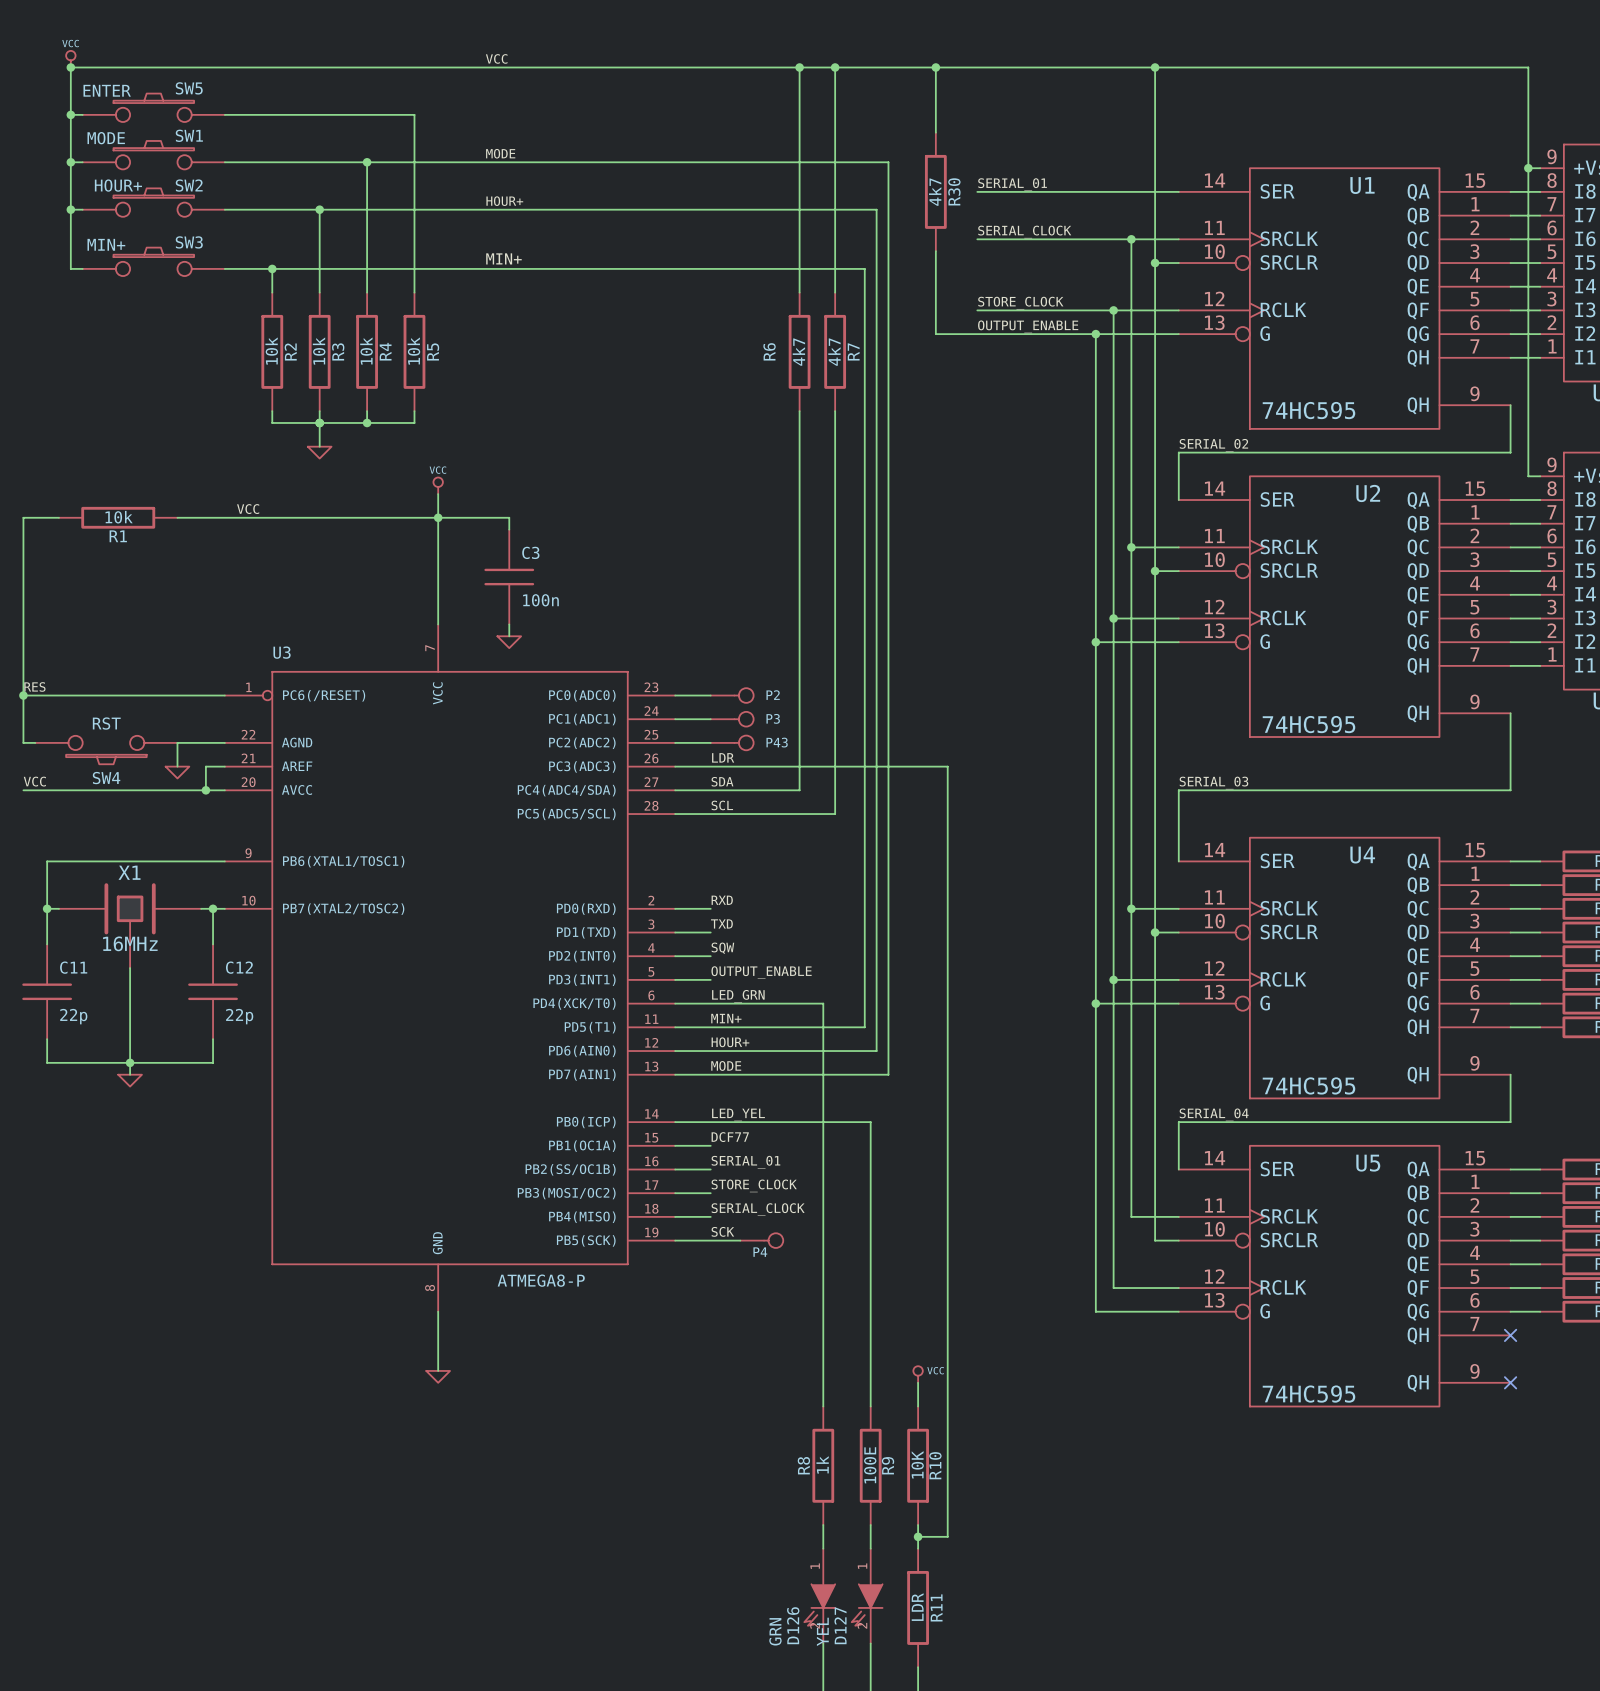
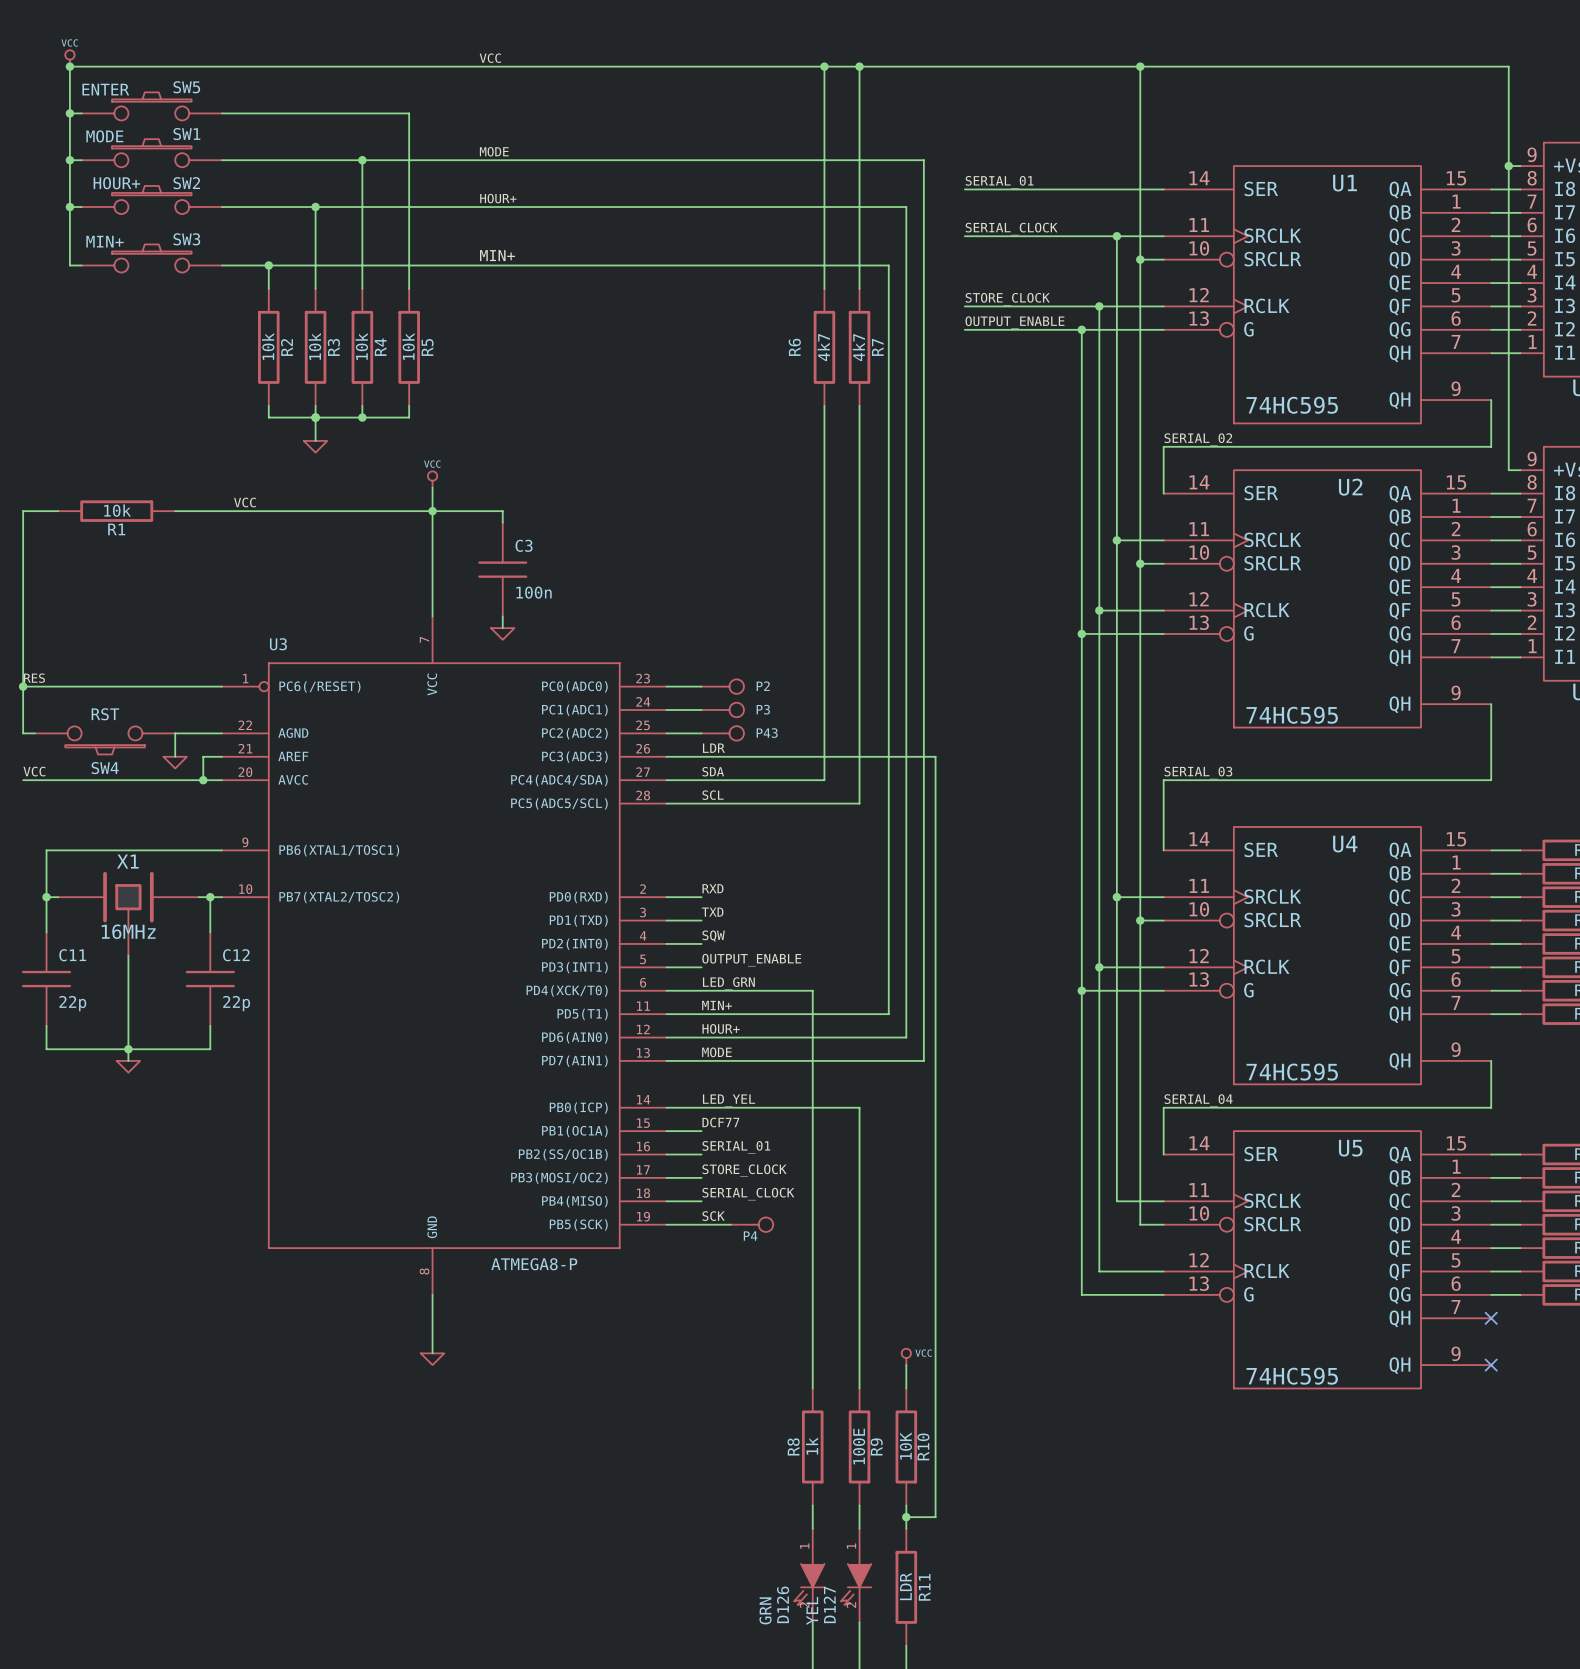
wire: (799, 67) (799, 292) -> (859, 66) (859, 288)
junction: (799, 67) -> none
junction: none -> (859, 66)
wire: (935, 67) (935, 132) -> none
junction: (935, 67) -> none
wire: (888, 162) (888, 1074) -> (923, 329) (923, 1060) (877, 1060)
wire: none -> (877, 160) (923, 160) (923, 247)
R30: 4k7 (935, 191) -> none
wire: (876, 209) (876, 1051) -> (865, 207) (906, 207) (906, 1037) (865, 1037)
wire: (864, 268) (864, 1027) -> (853, 265) (888, 265) (888, 1014) (853, 1014)
wire: (935, 334) (977, 334) -> none
R6: 4k7 (799, 351) -> none
R7 name: R7 (853, 351) -> R6 (794, 347)
R7: none -> 4k7 (859, 347)
wire: (799, 411) (799, 790) -> none
wire: none -> (859, 405) (859, 803) (824, 803)
wire: (835, 790) (835, 814) -> (824, 780) (789, 780)

